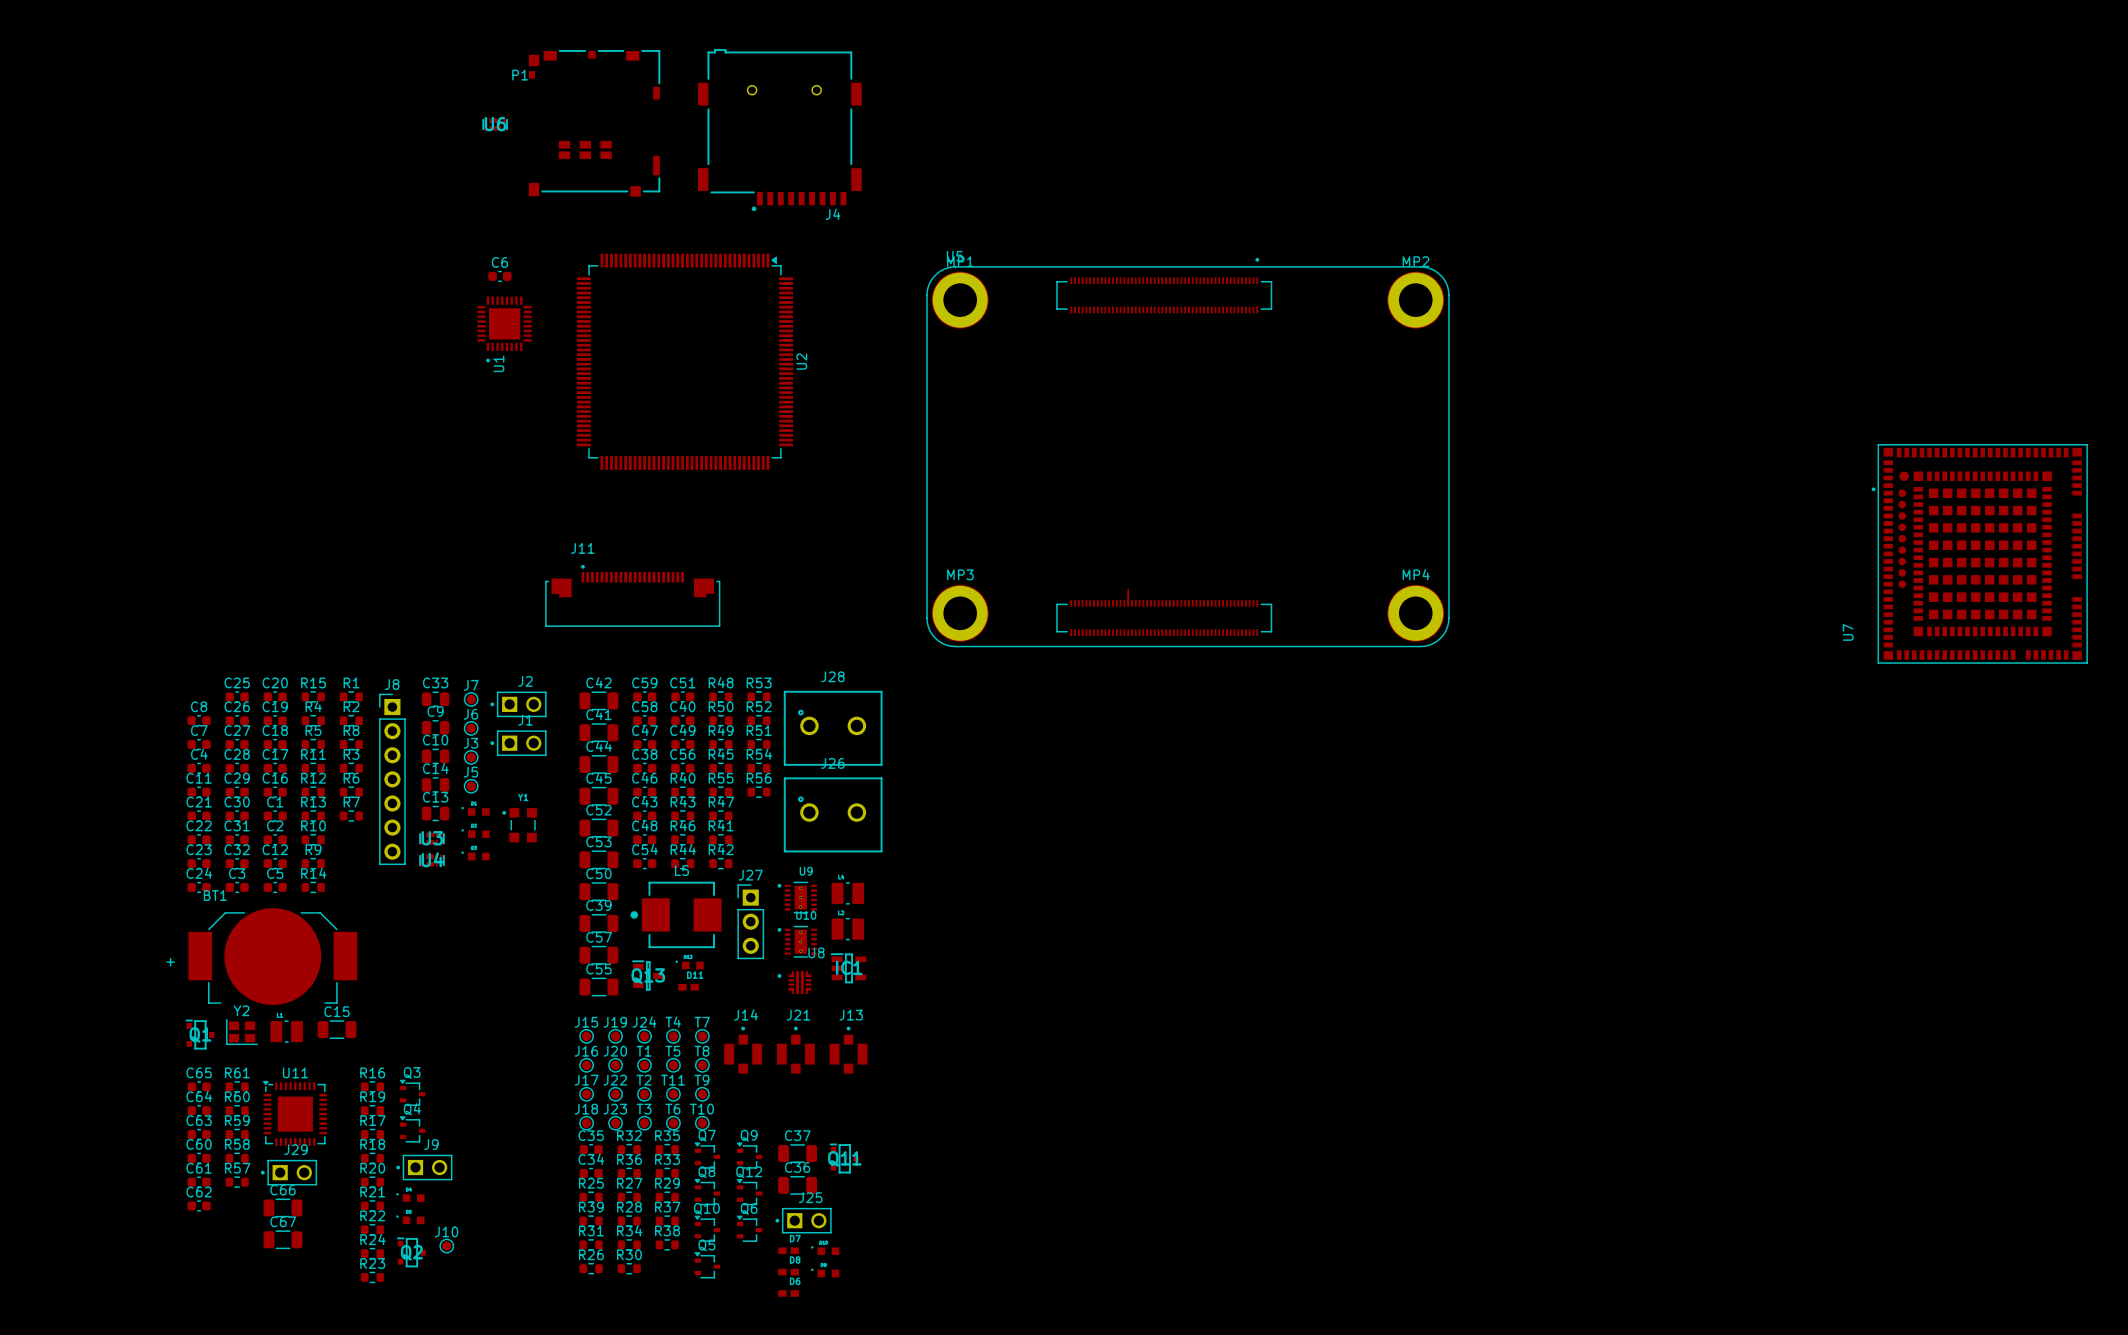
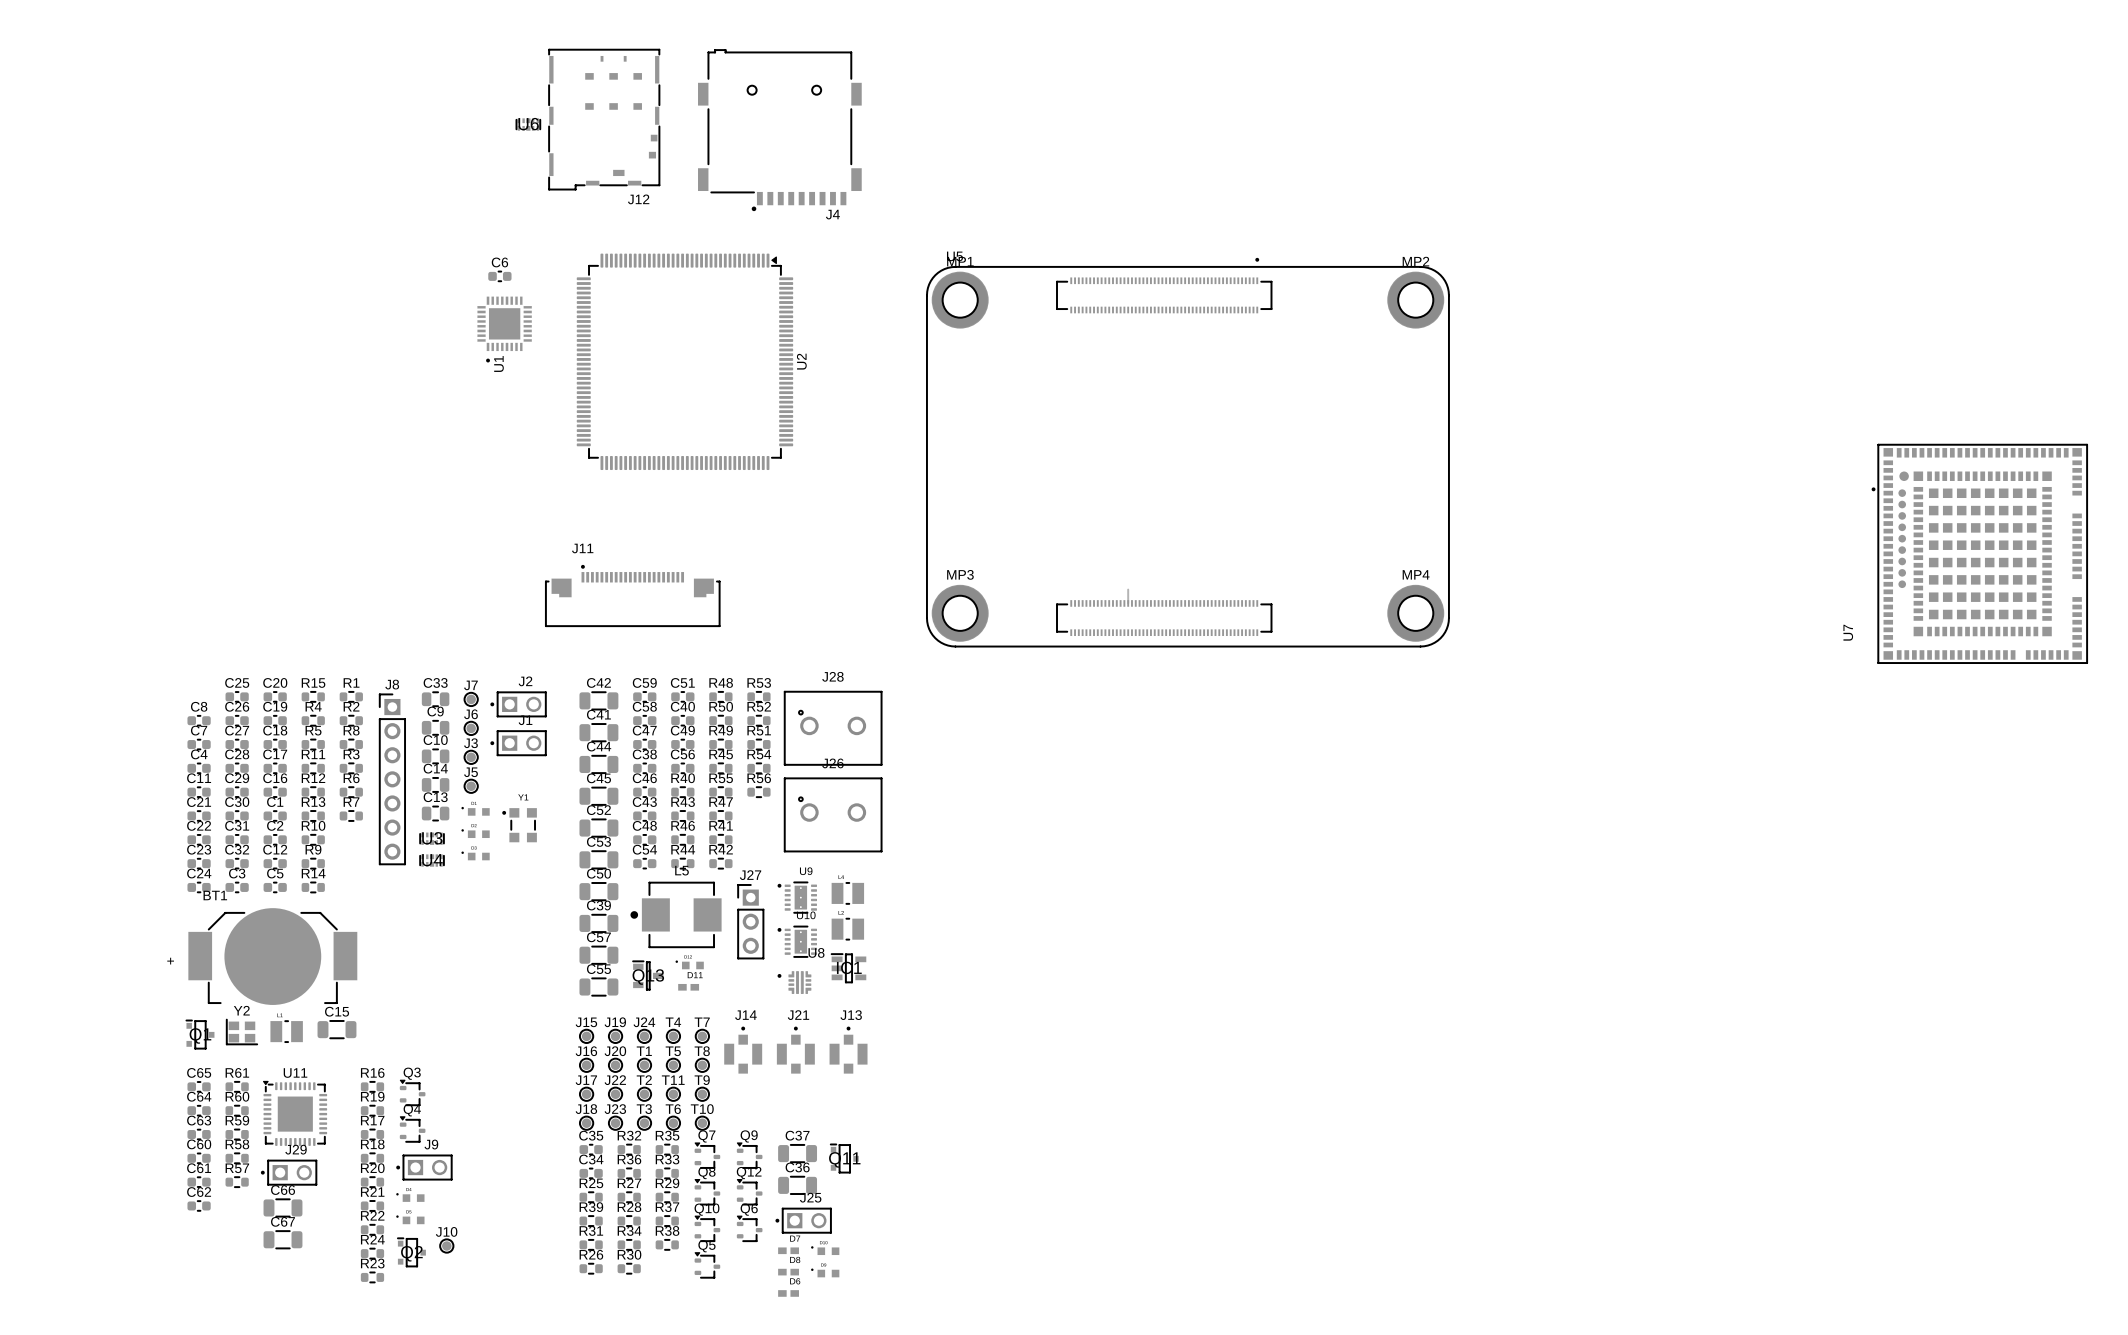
J12: none -> (604, 119)
P1: (594, 123) -> none
U6 position: (495, 124) -> (528, 124)

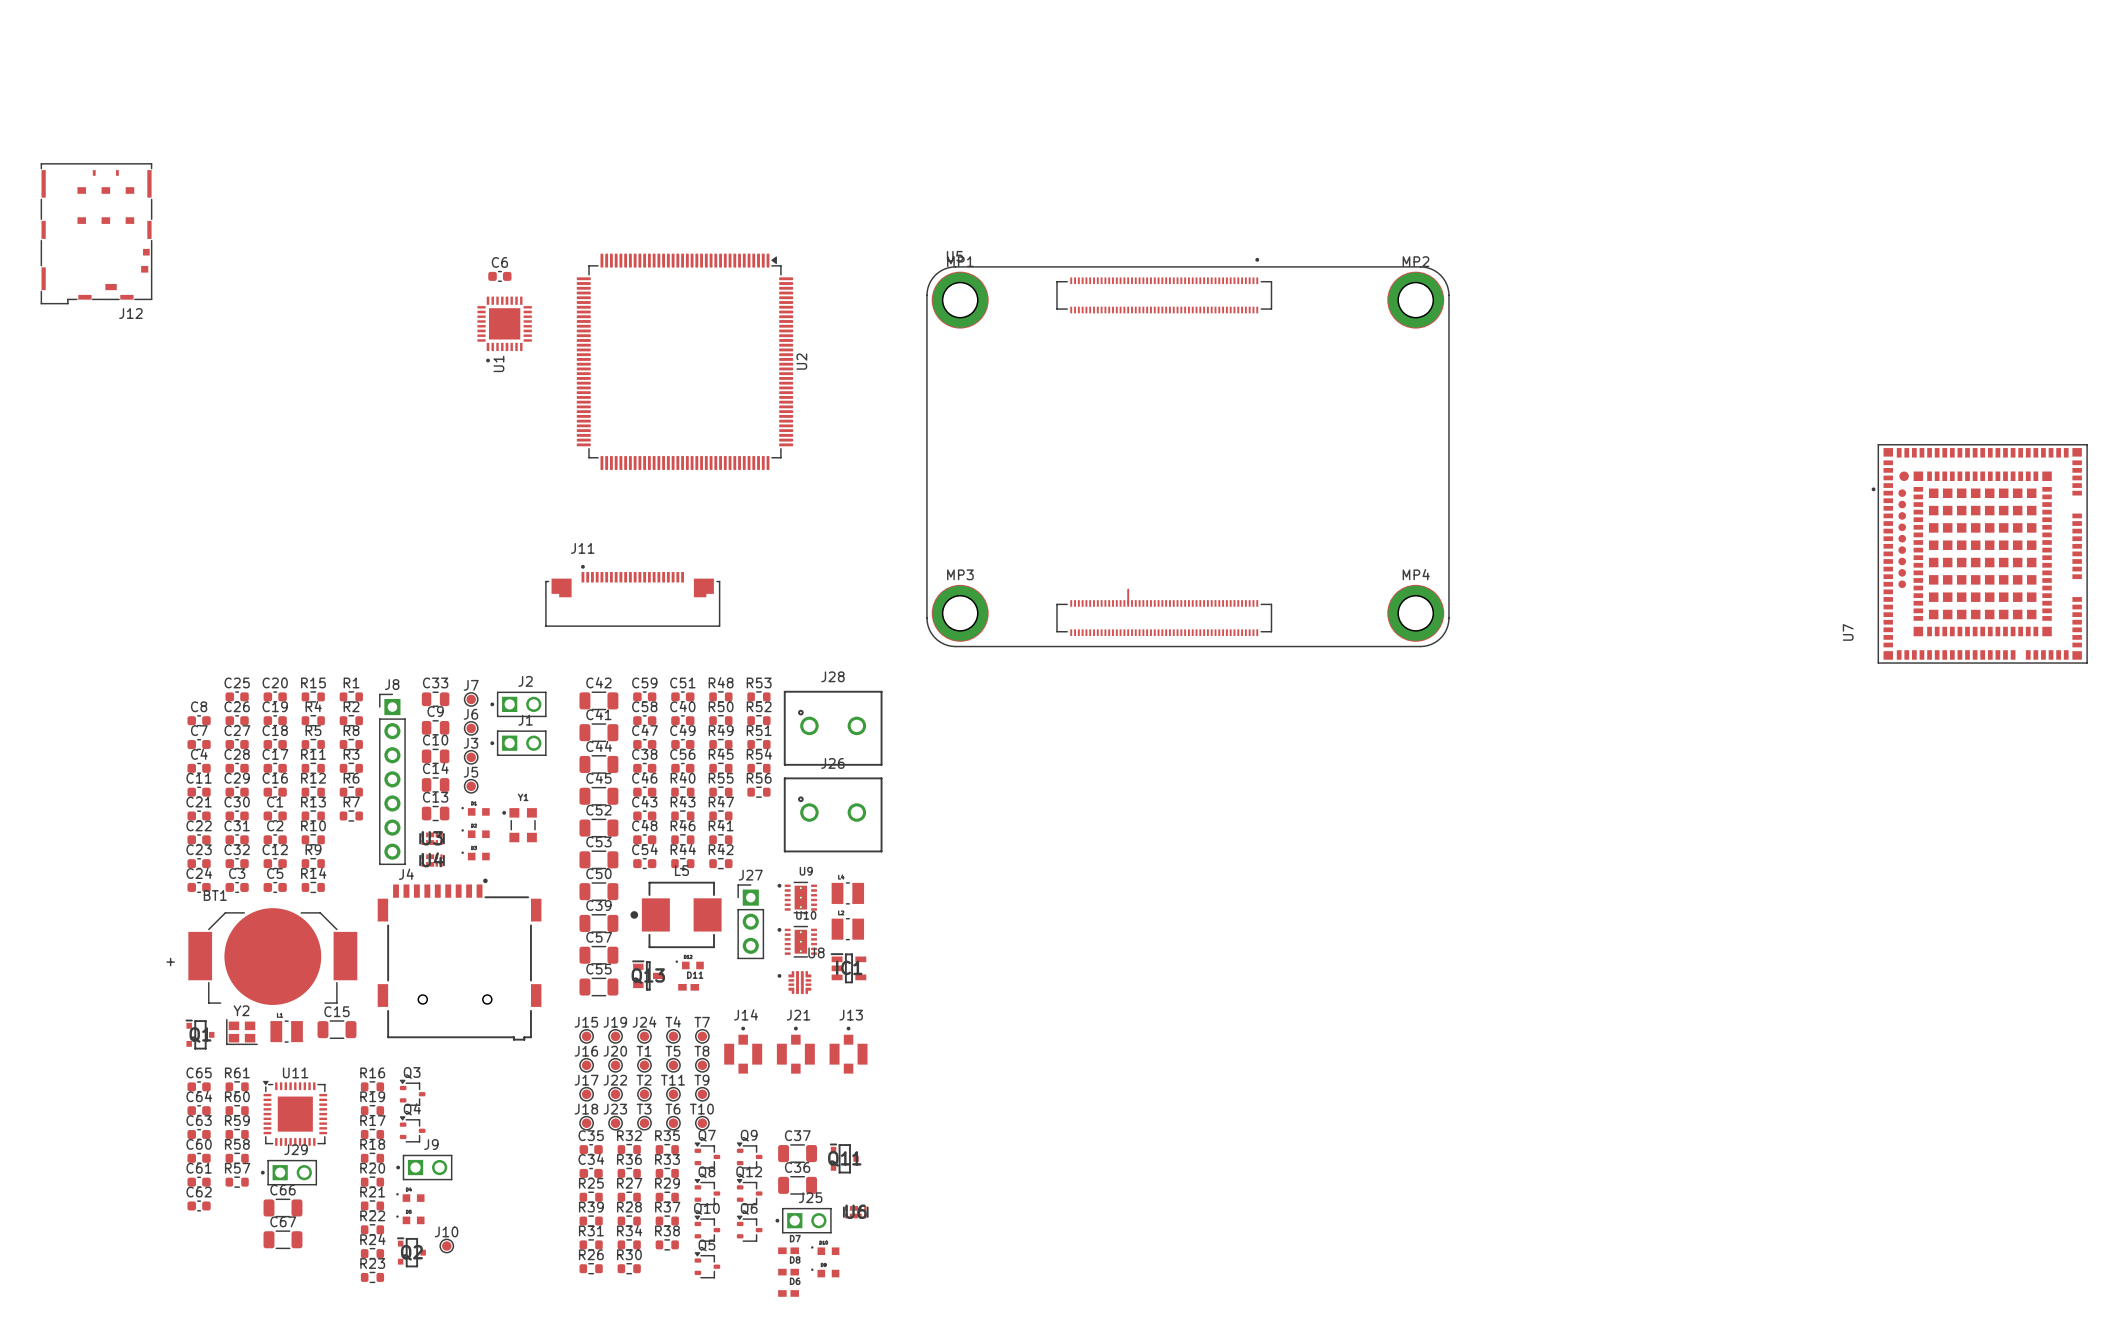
J12 position: (604, 119) -> (96, 233)
U6 position: (528, 124) -> (855, 1212)
J4 rotation: 0° (779, 130) -> 180° (459, 959)
J4 position: (779, 130) -> (459, 959)

